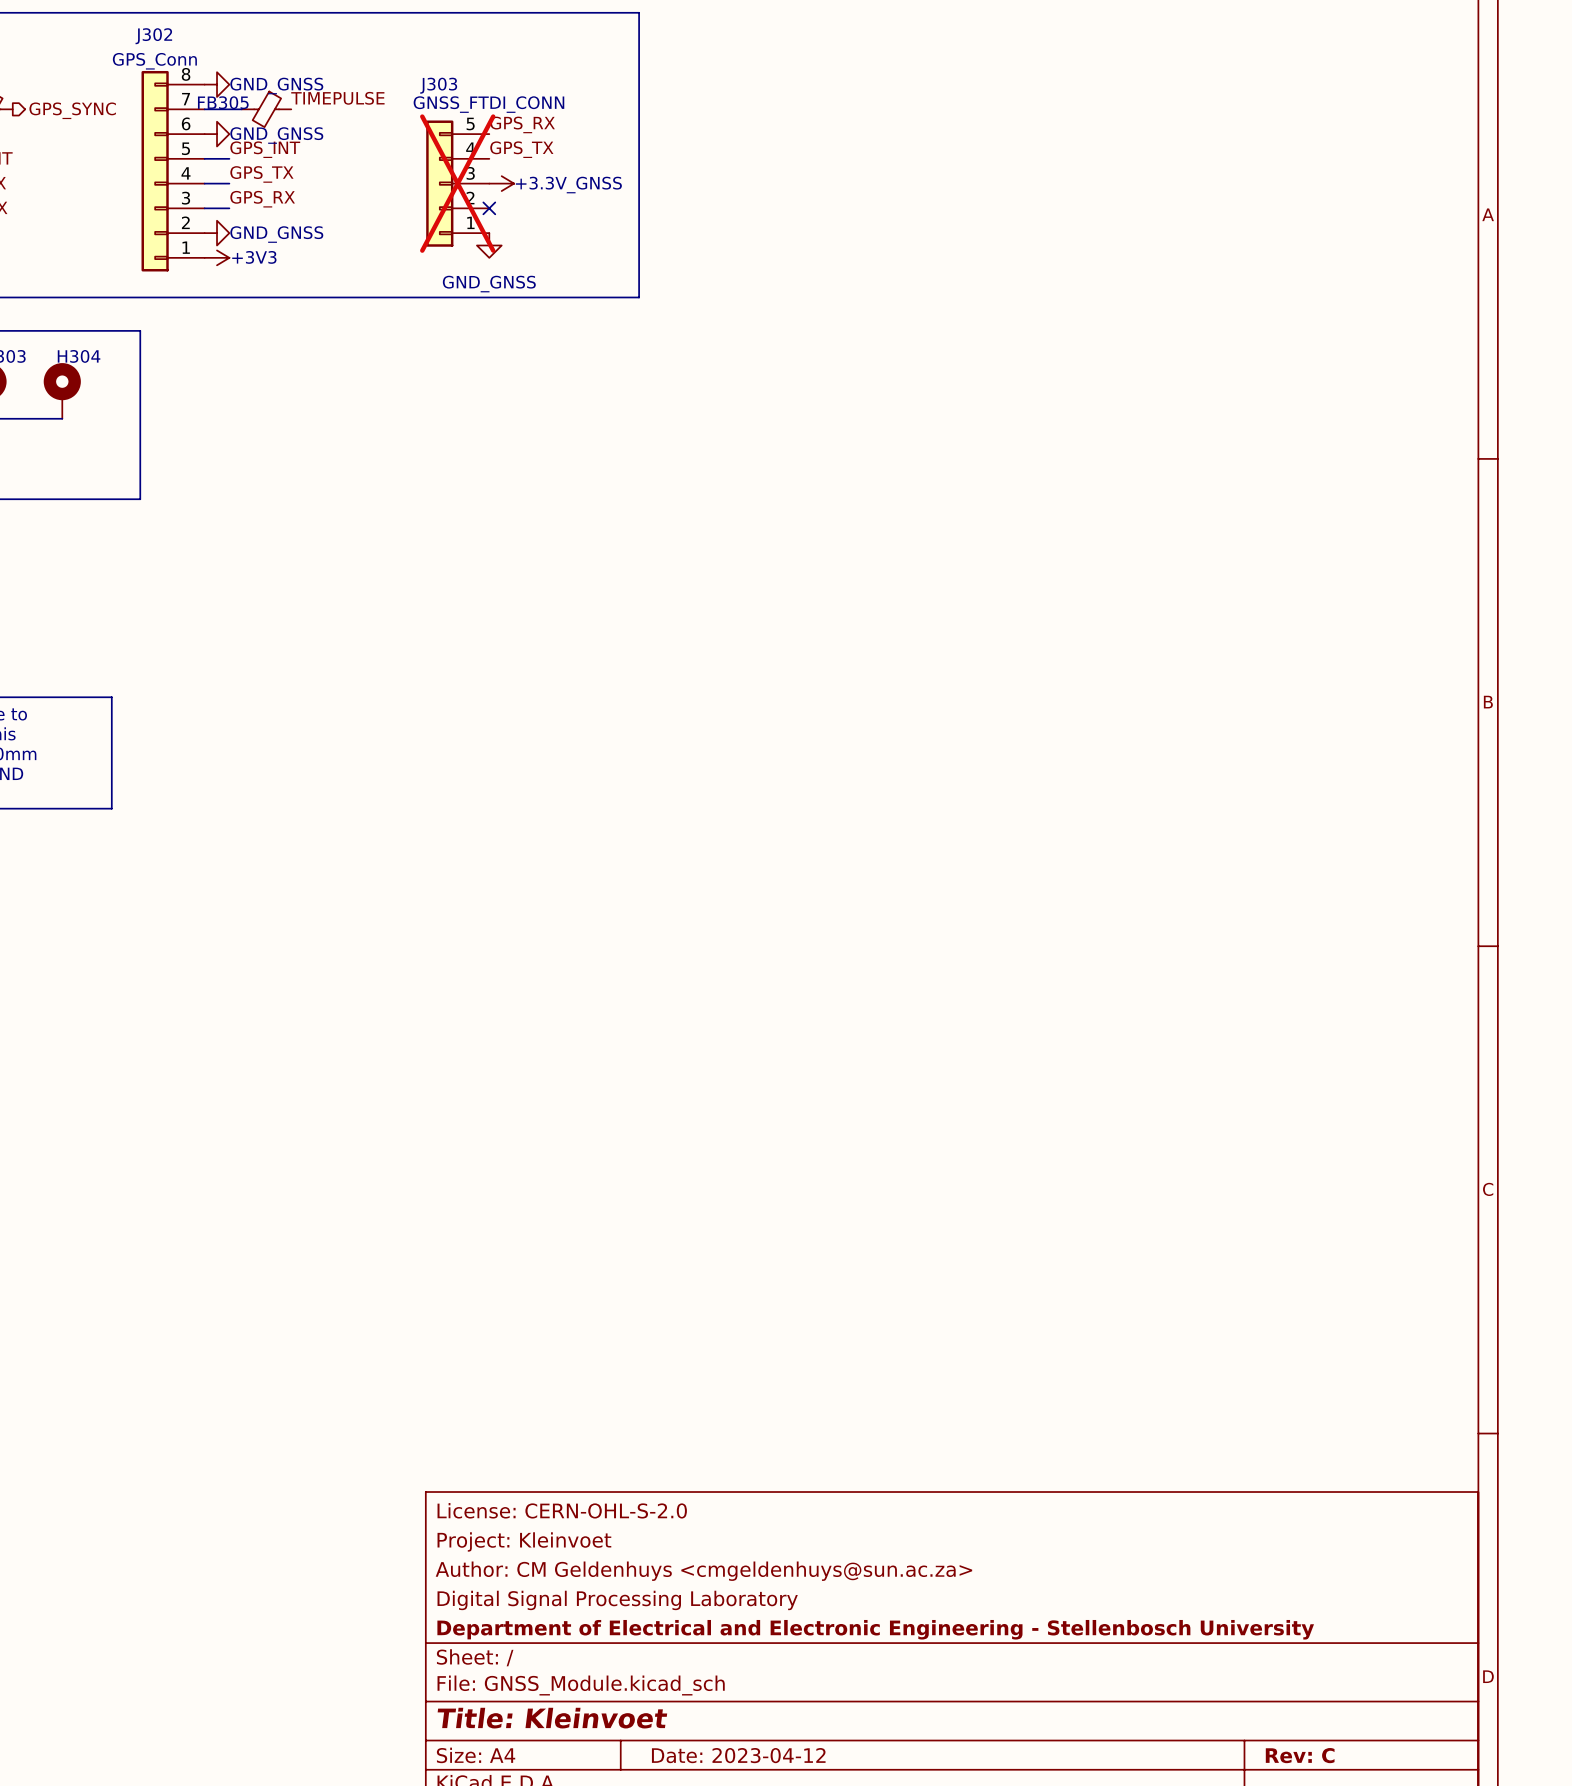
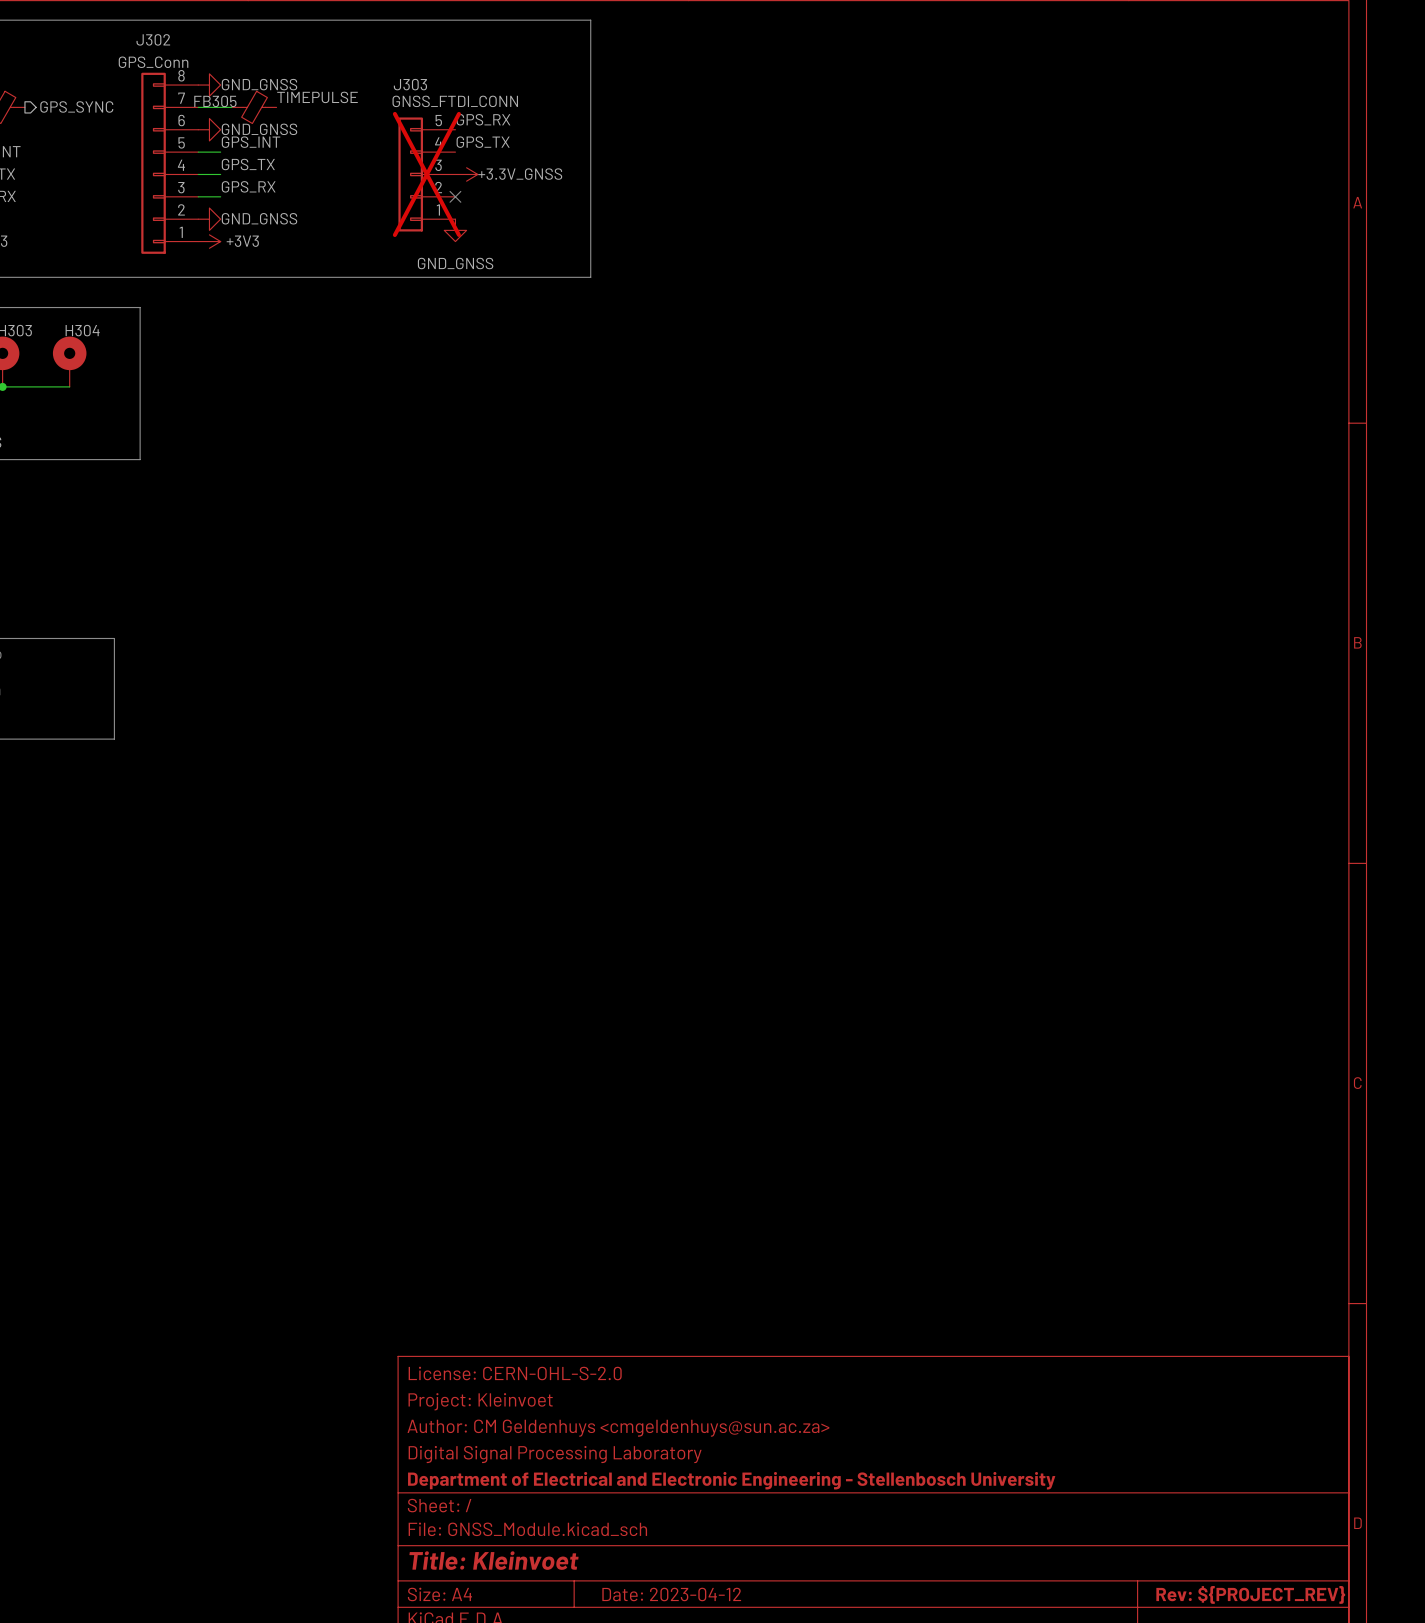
title block: Rev: C (1300, 1755) -> Rev: ${PROJECT_REV} (1250, 1594)

